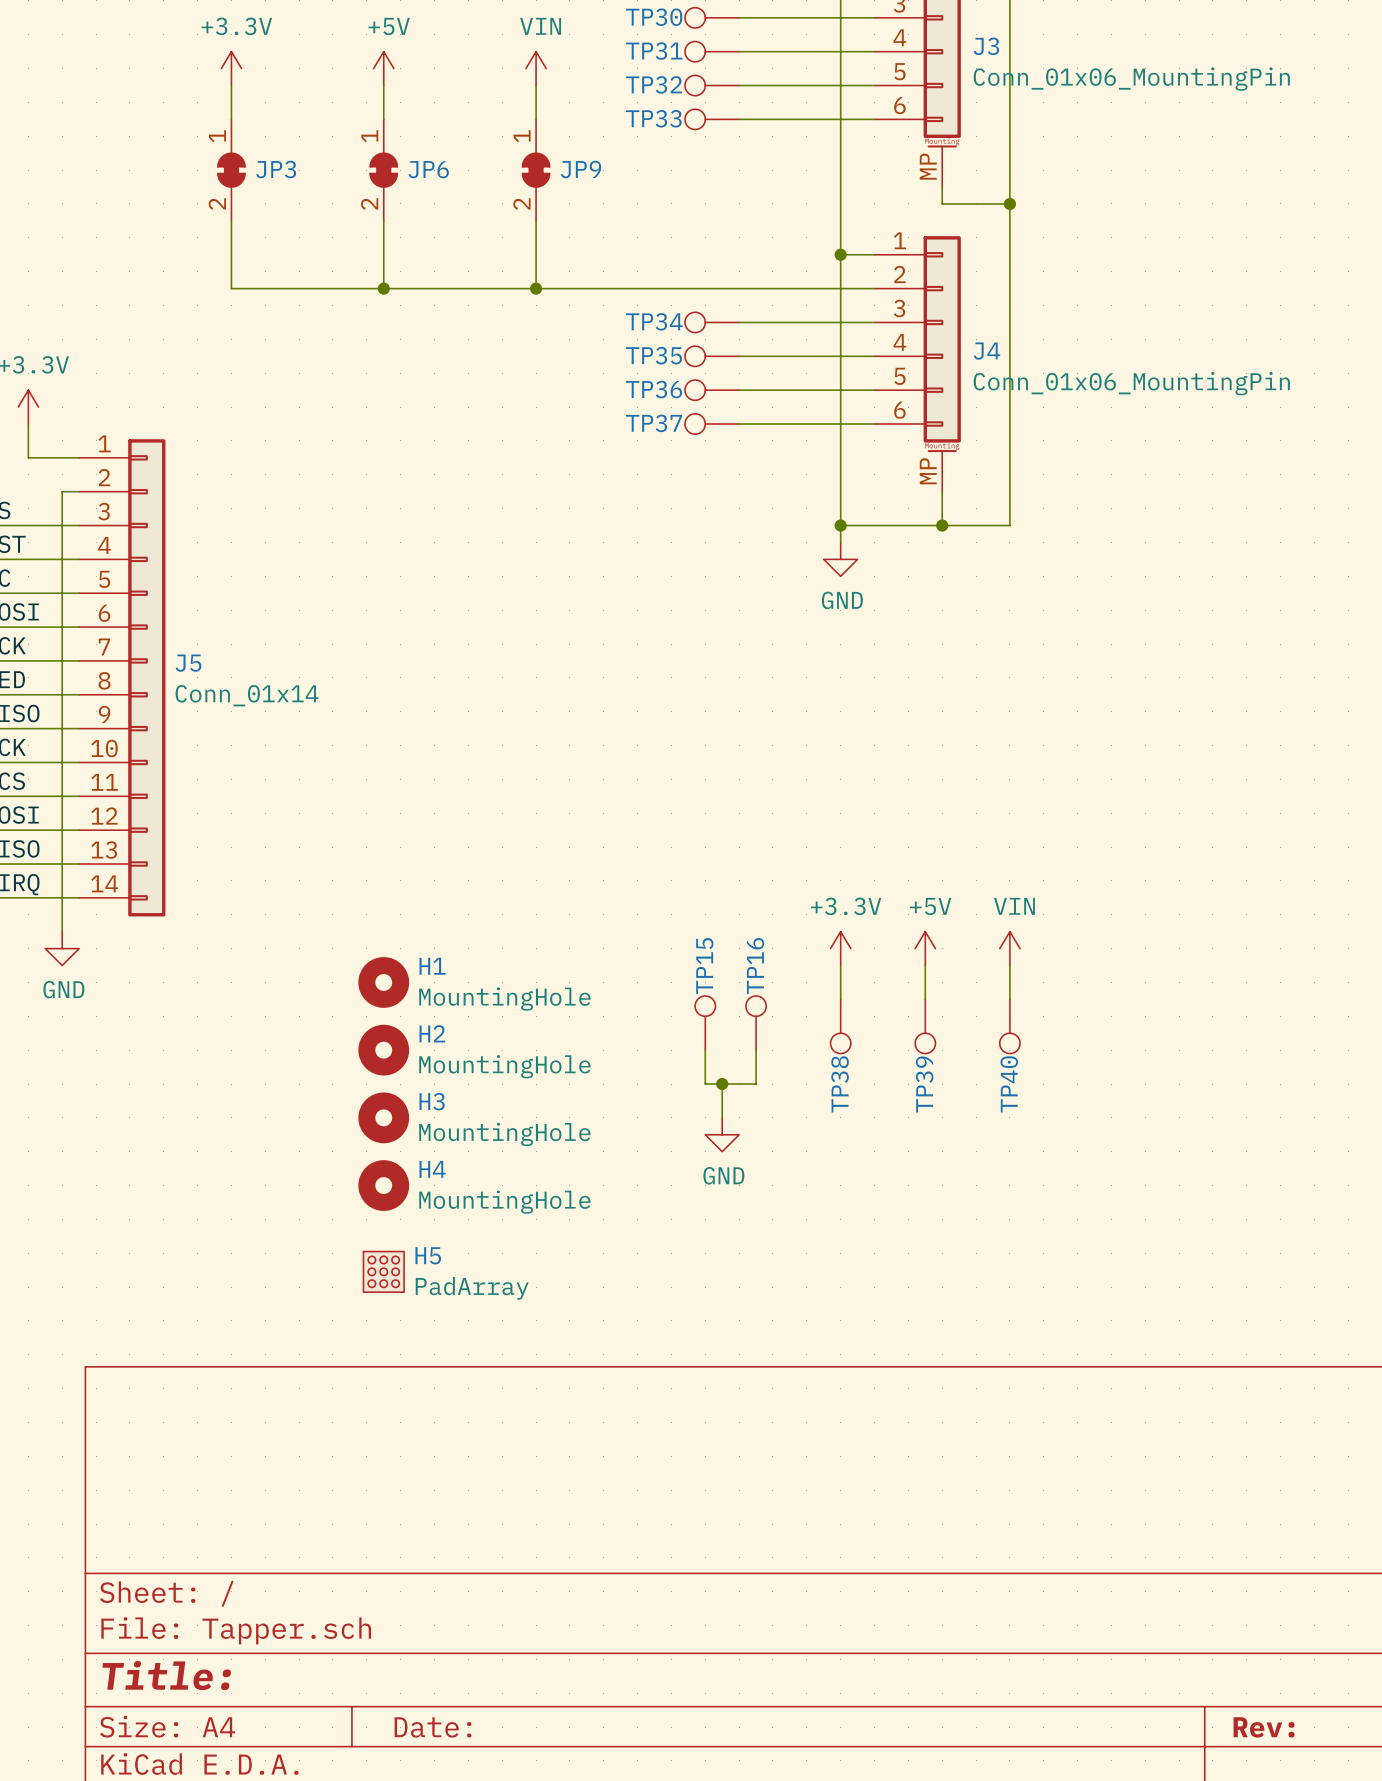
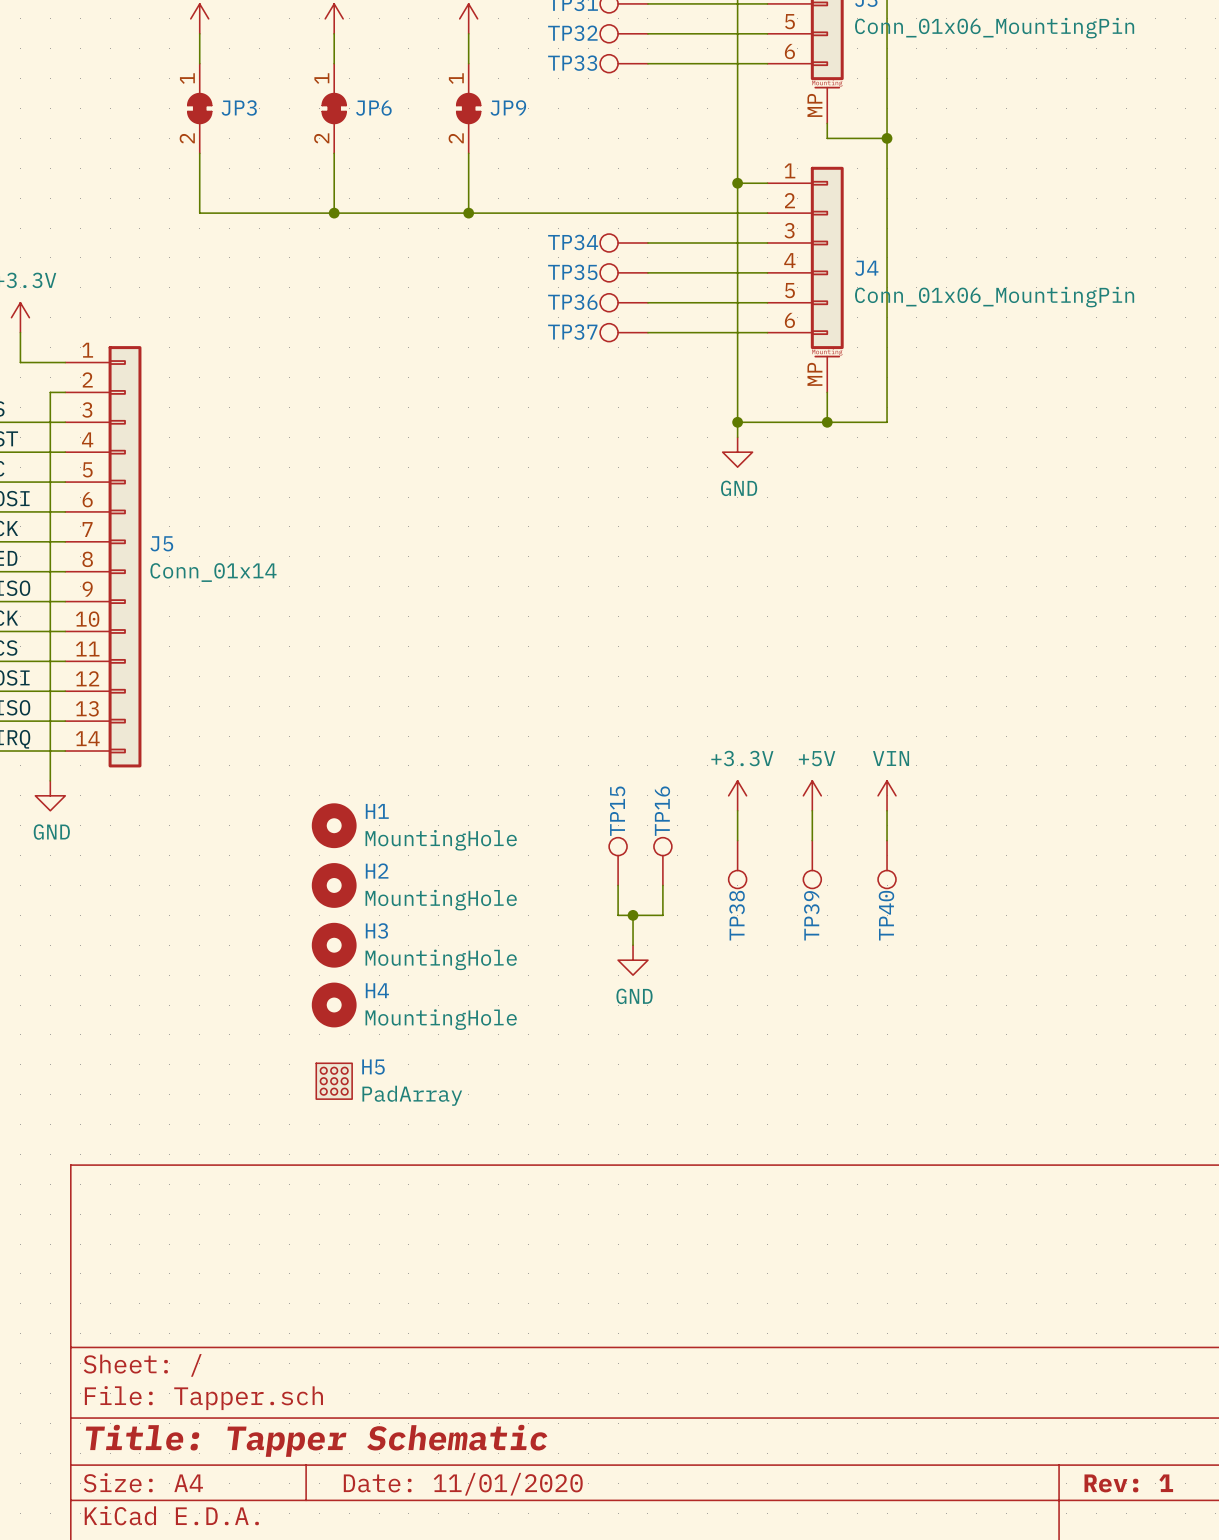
title block: Title: (166, 1675) -> Title: Tapper Schematic (316, 1440)
title block: Date: (432, 1727) -> Date: 11/01/2020 (463, 1484)
title block: Rev: (1264, 1727) -> Rev: 1 (1128, 1483)

